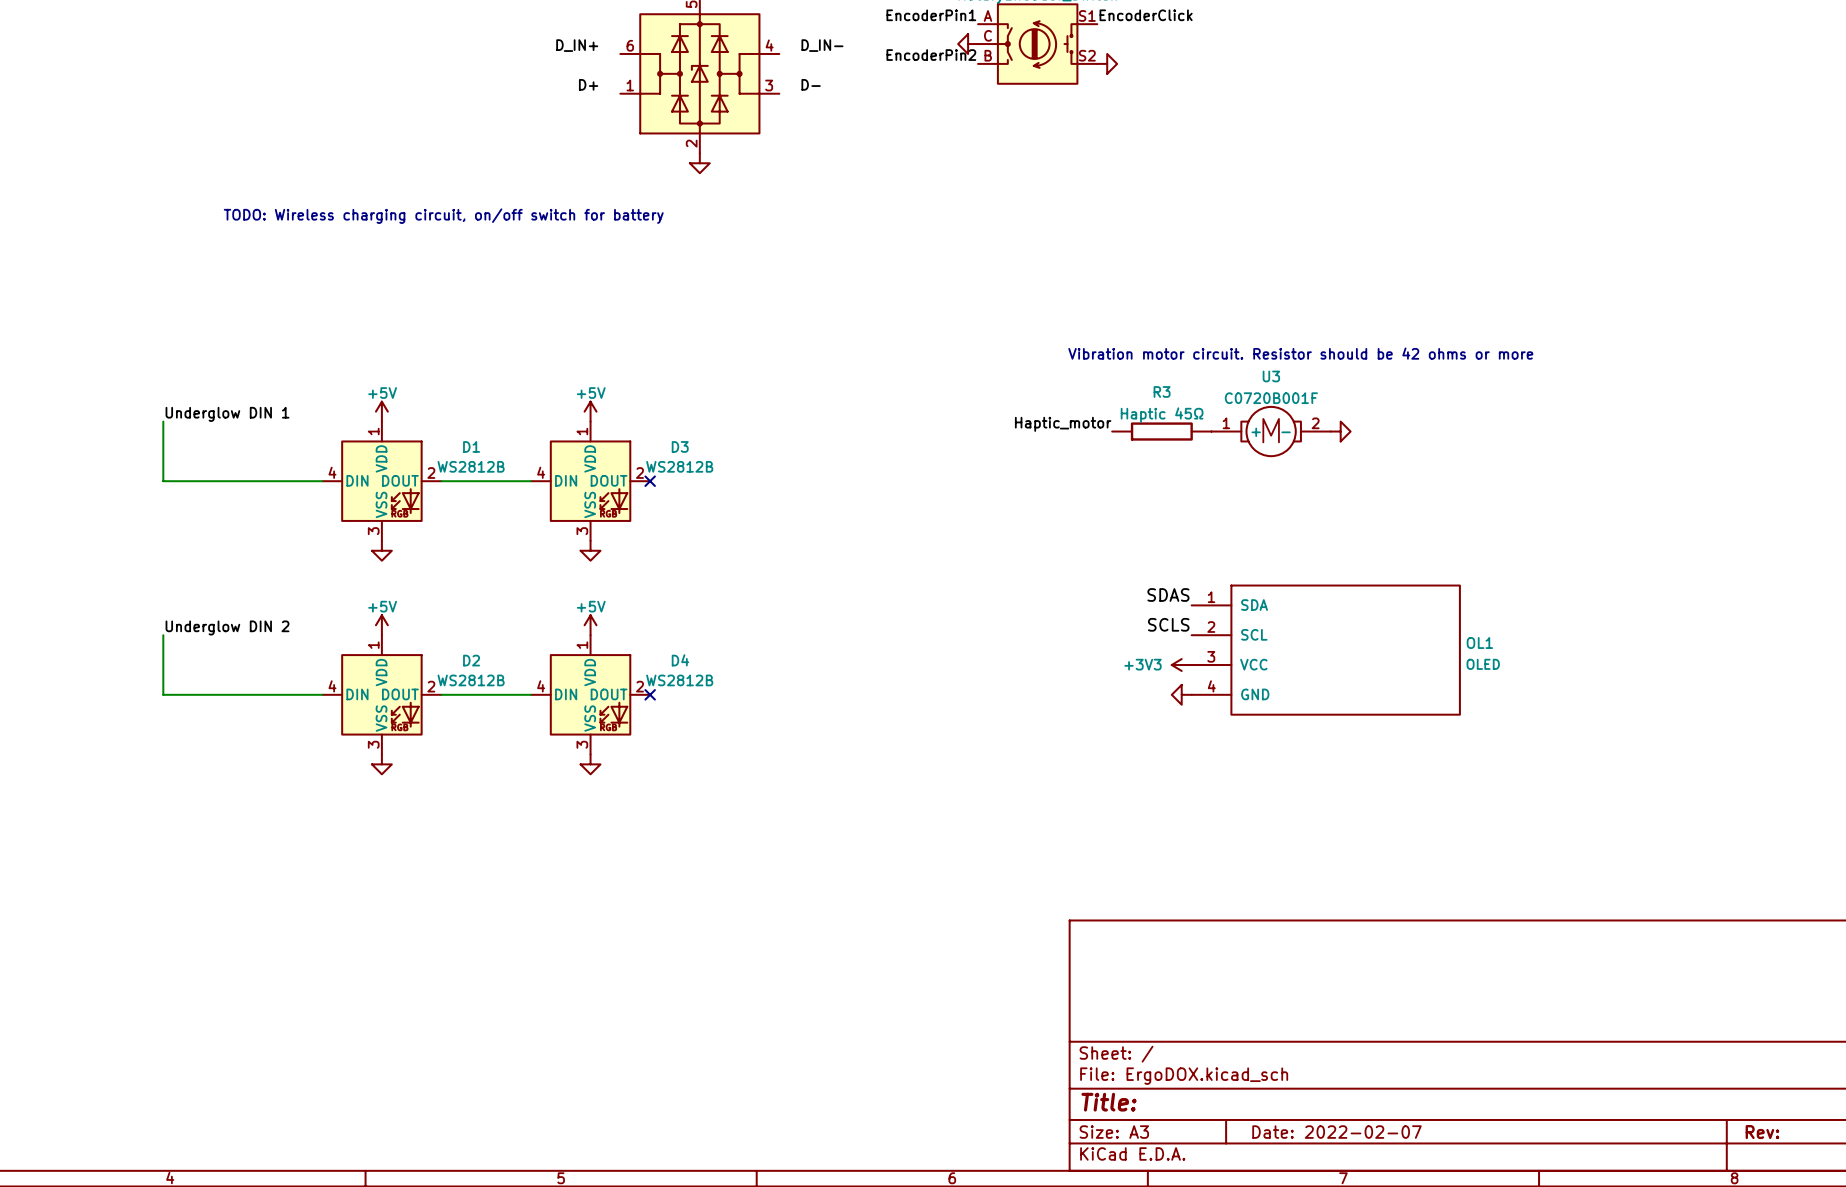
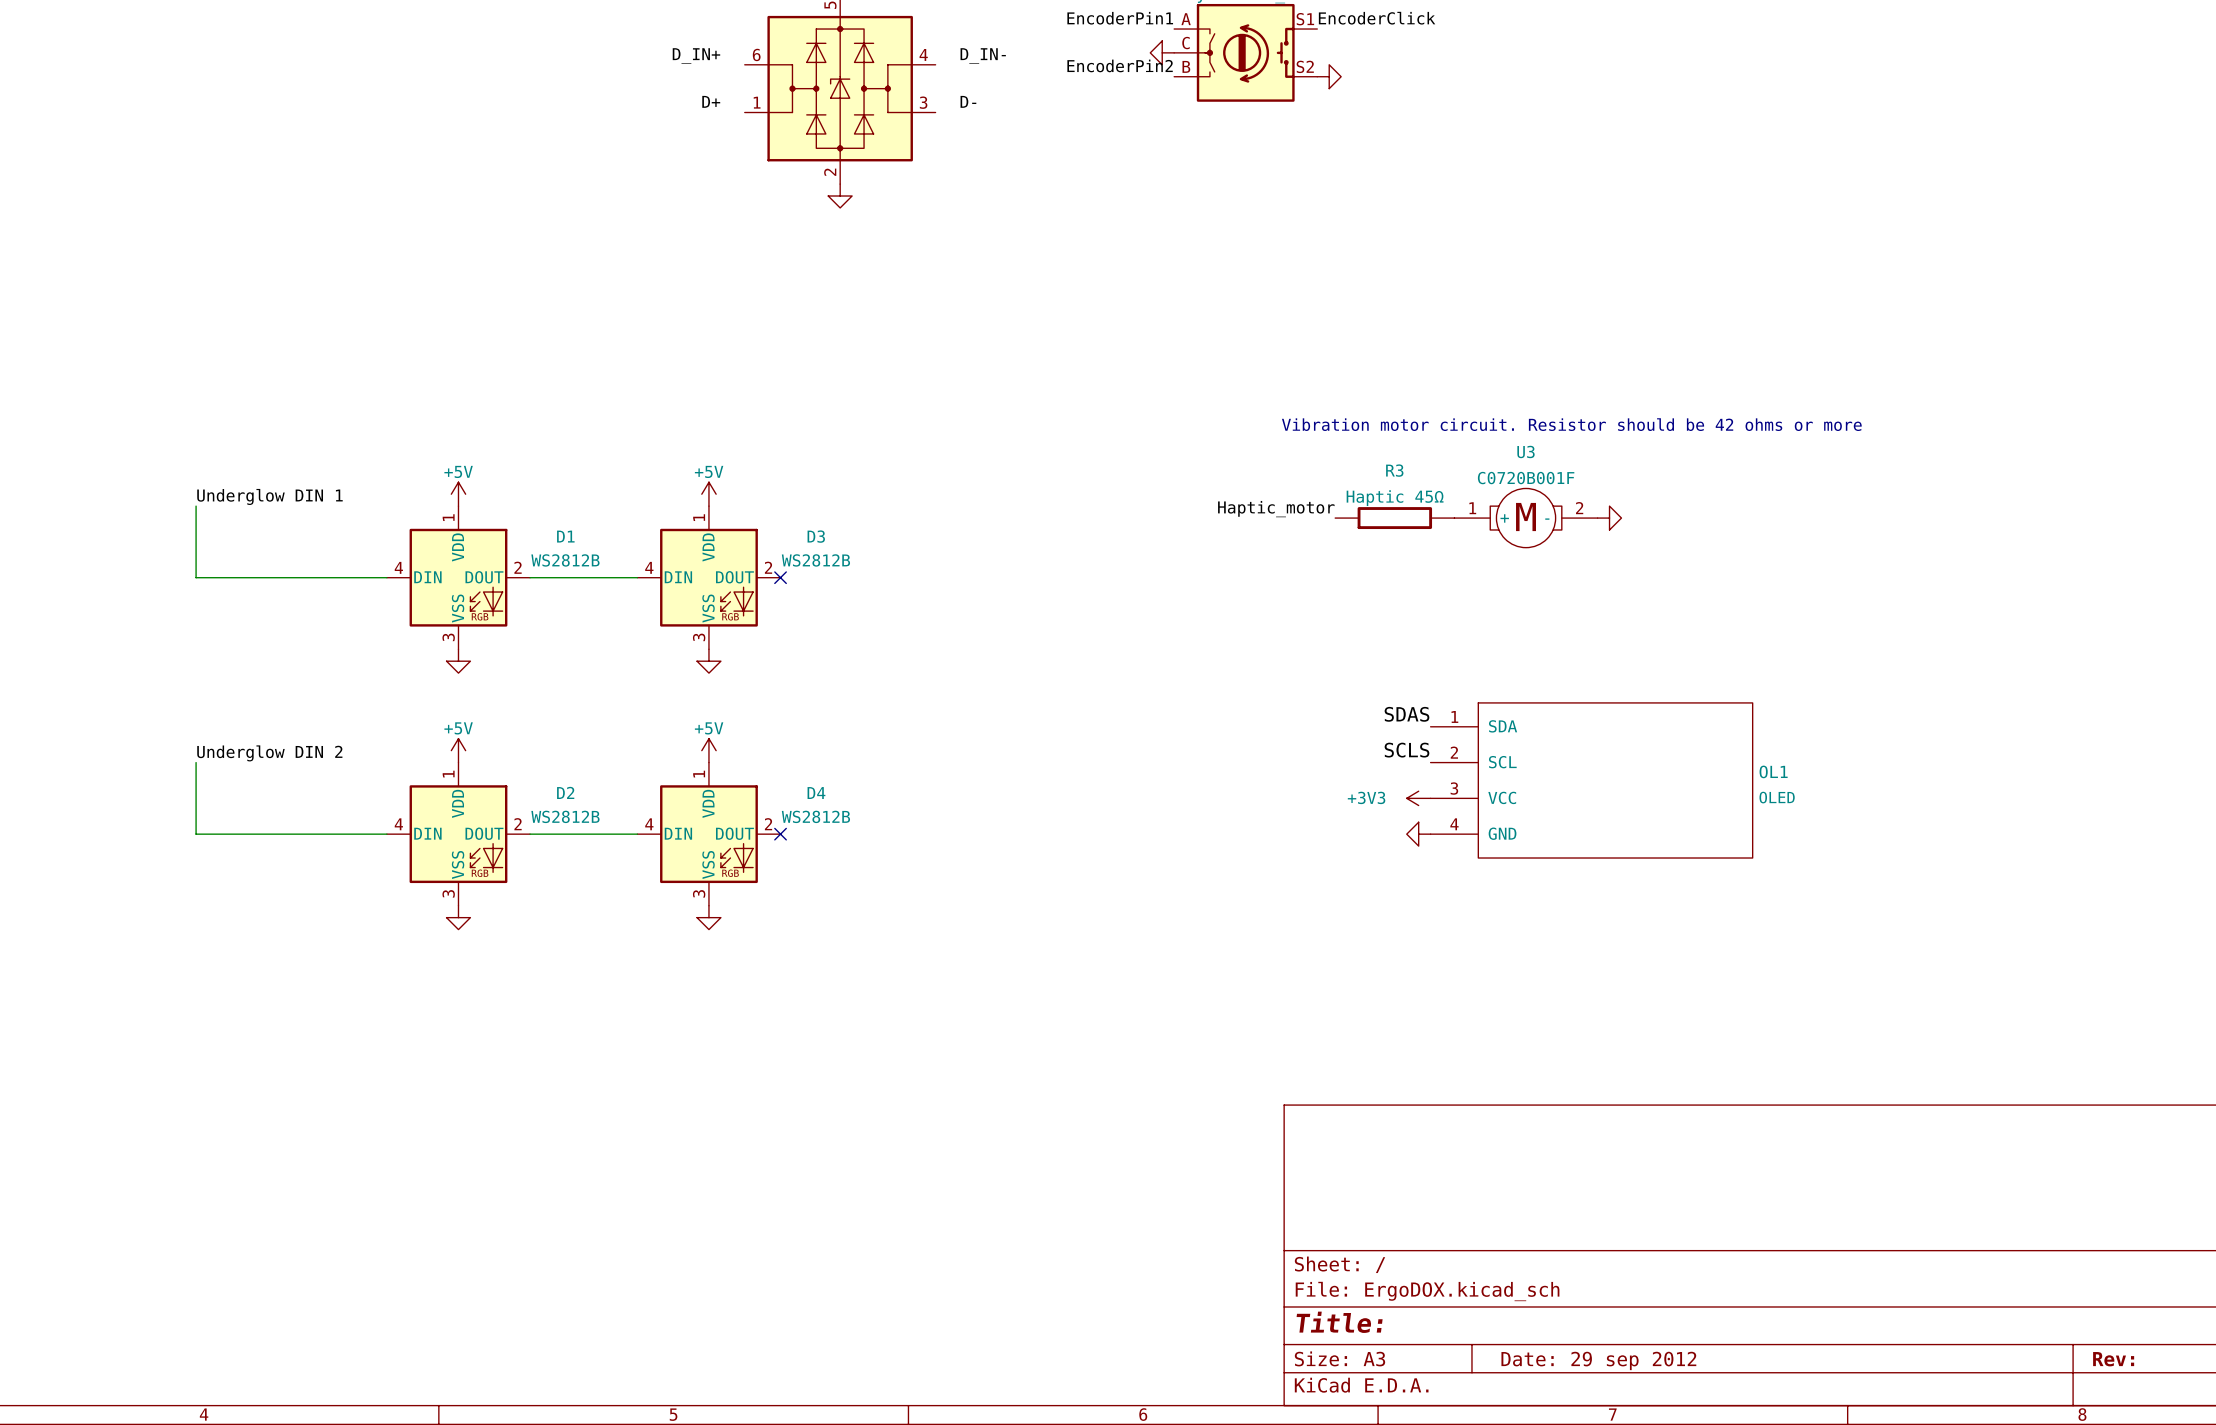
text: TODO: Wireless charging circuit, on/off switch for battery (443, 216) -> none
title block: Date: 2022-02-07 (1336, 1132) -> Date: 29 sep 2012 (1598, 1360)

